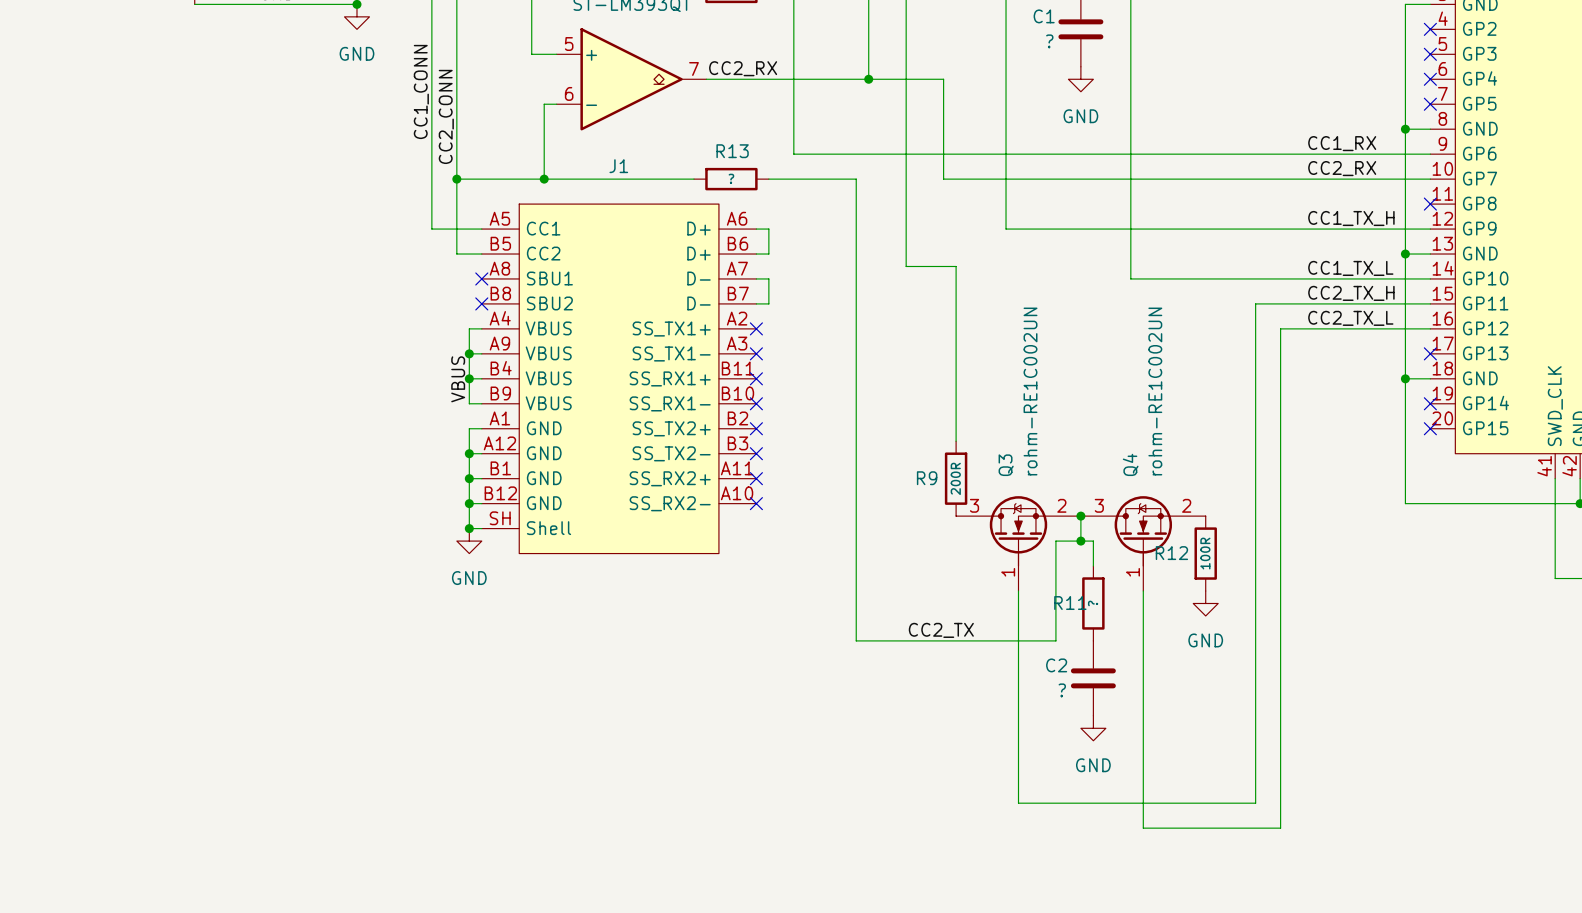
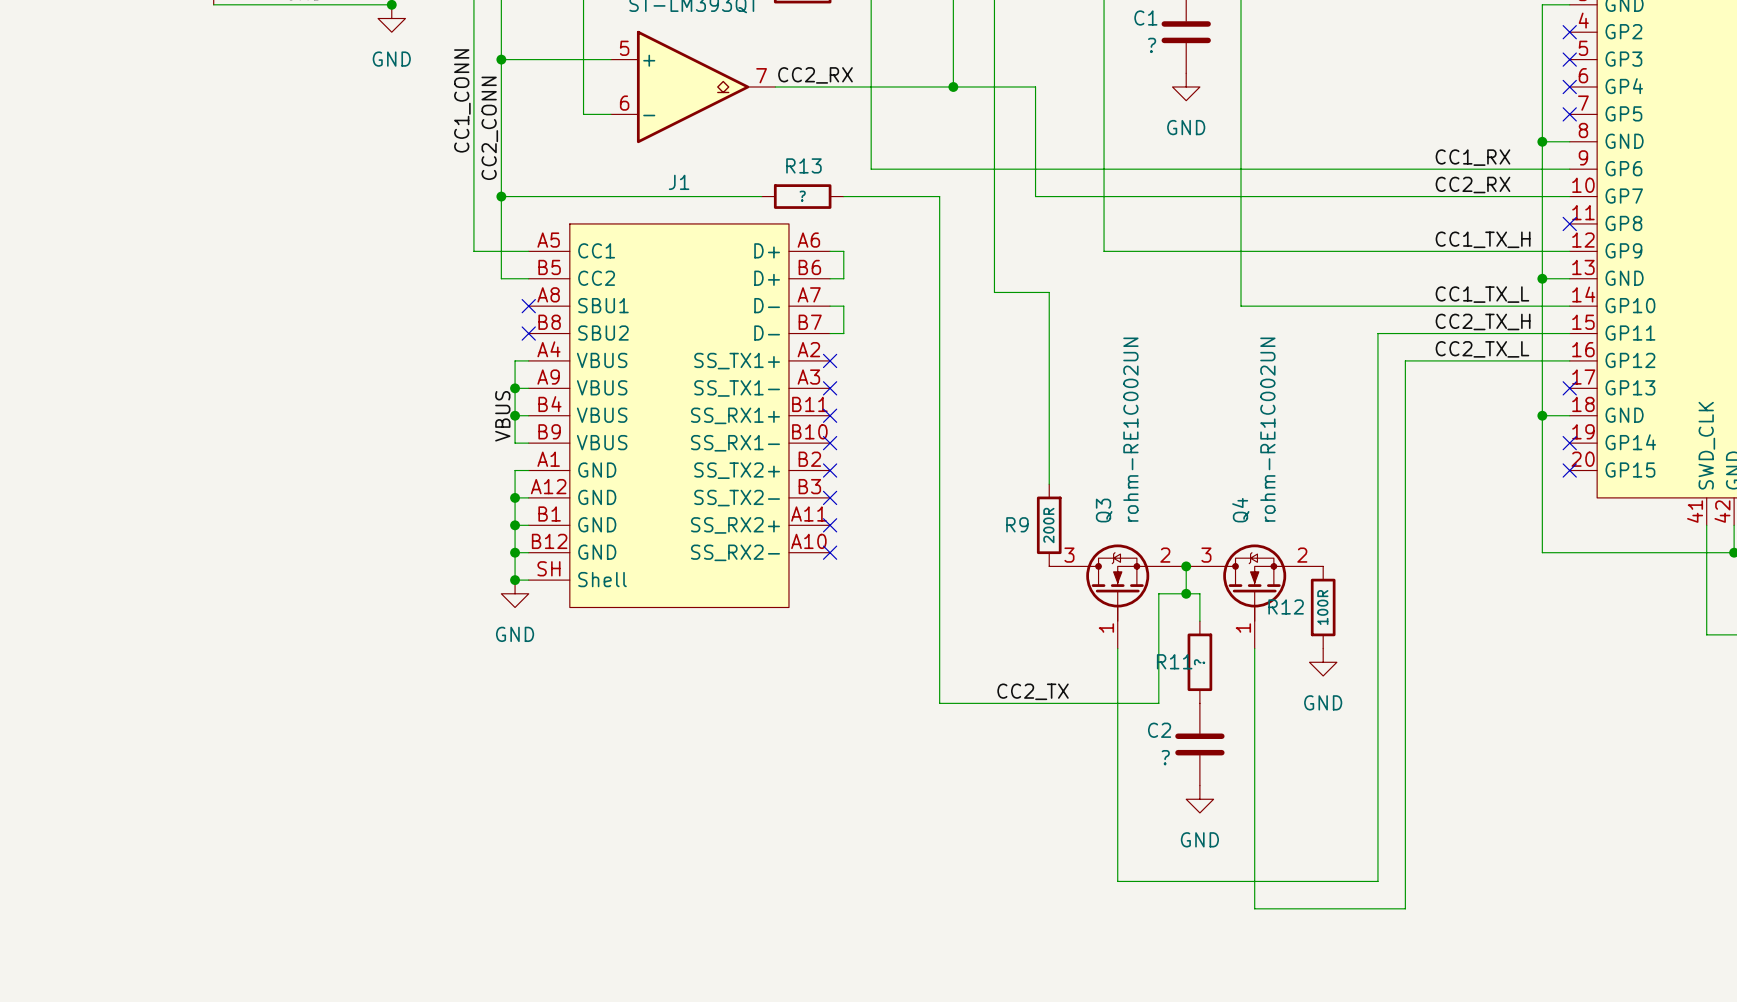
junction: none -> (501, 59)
wire: (544, 104) (544, 179) -> (597, 114) (583, 114) (583, 59) (501, 59)
junction: (544, 179) -> none

